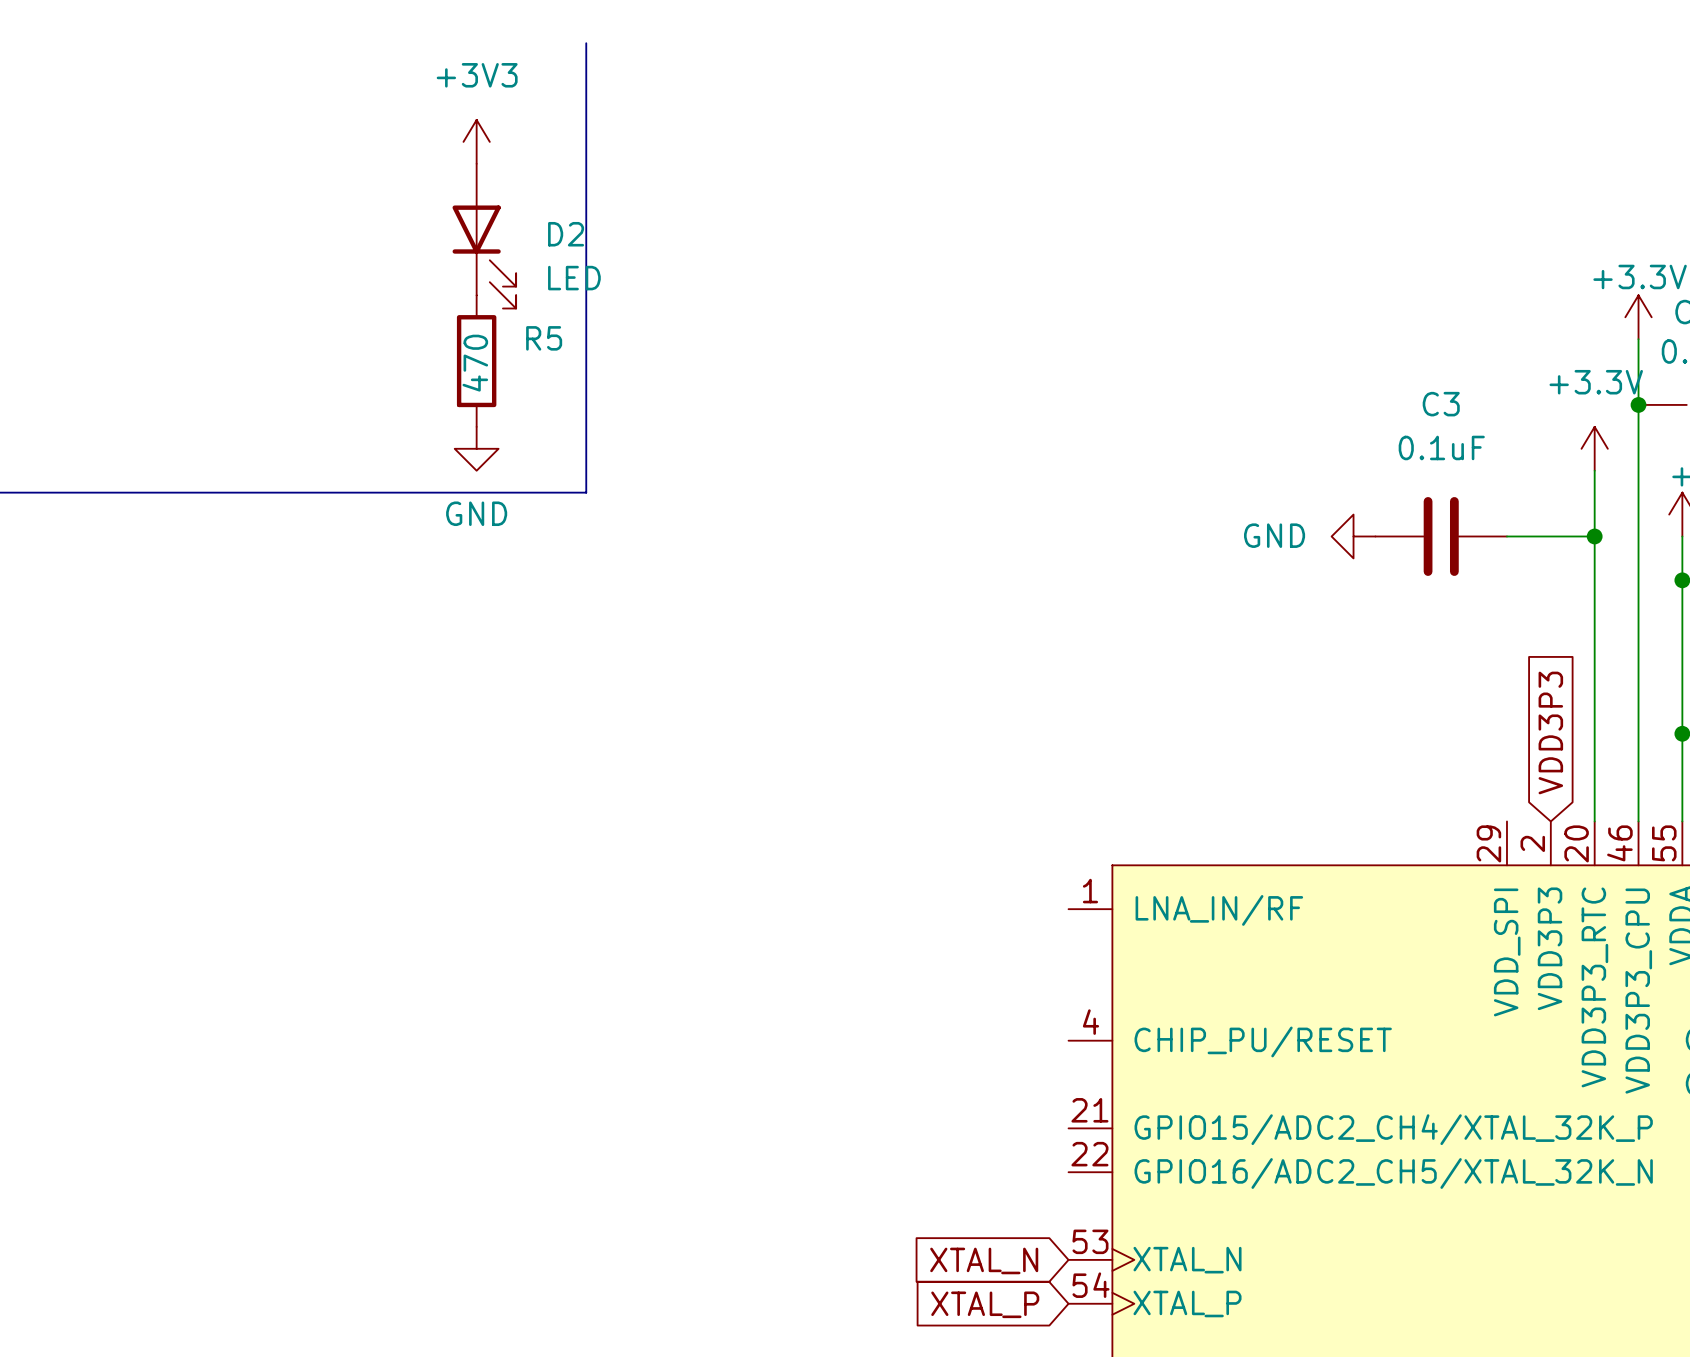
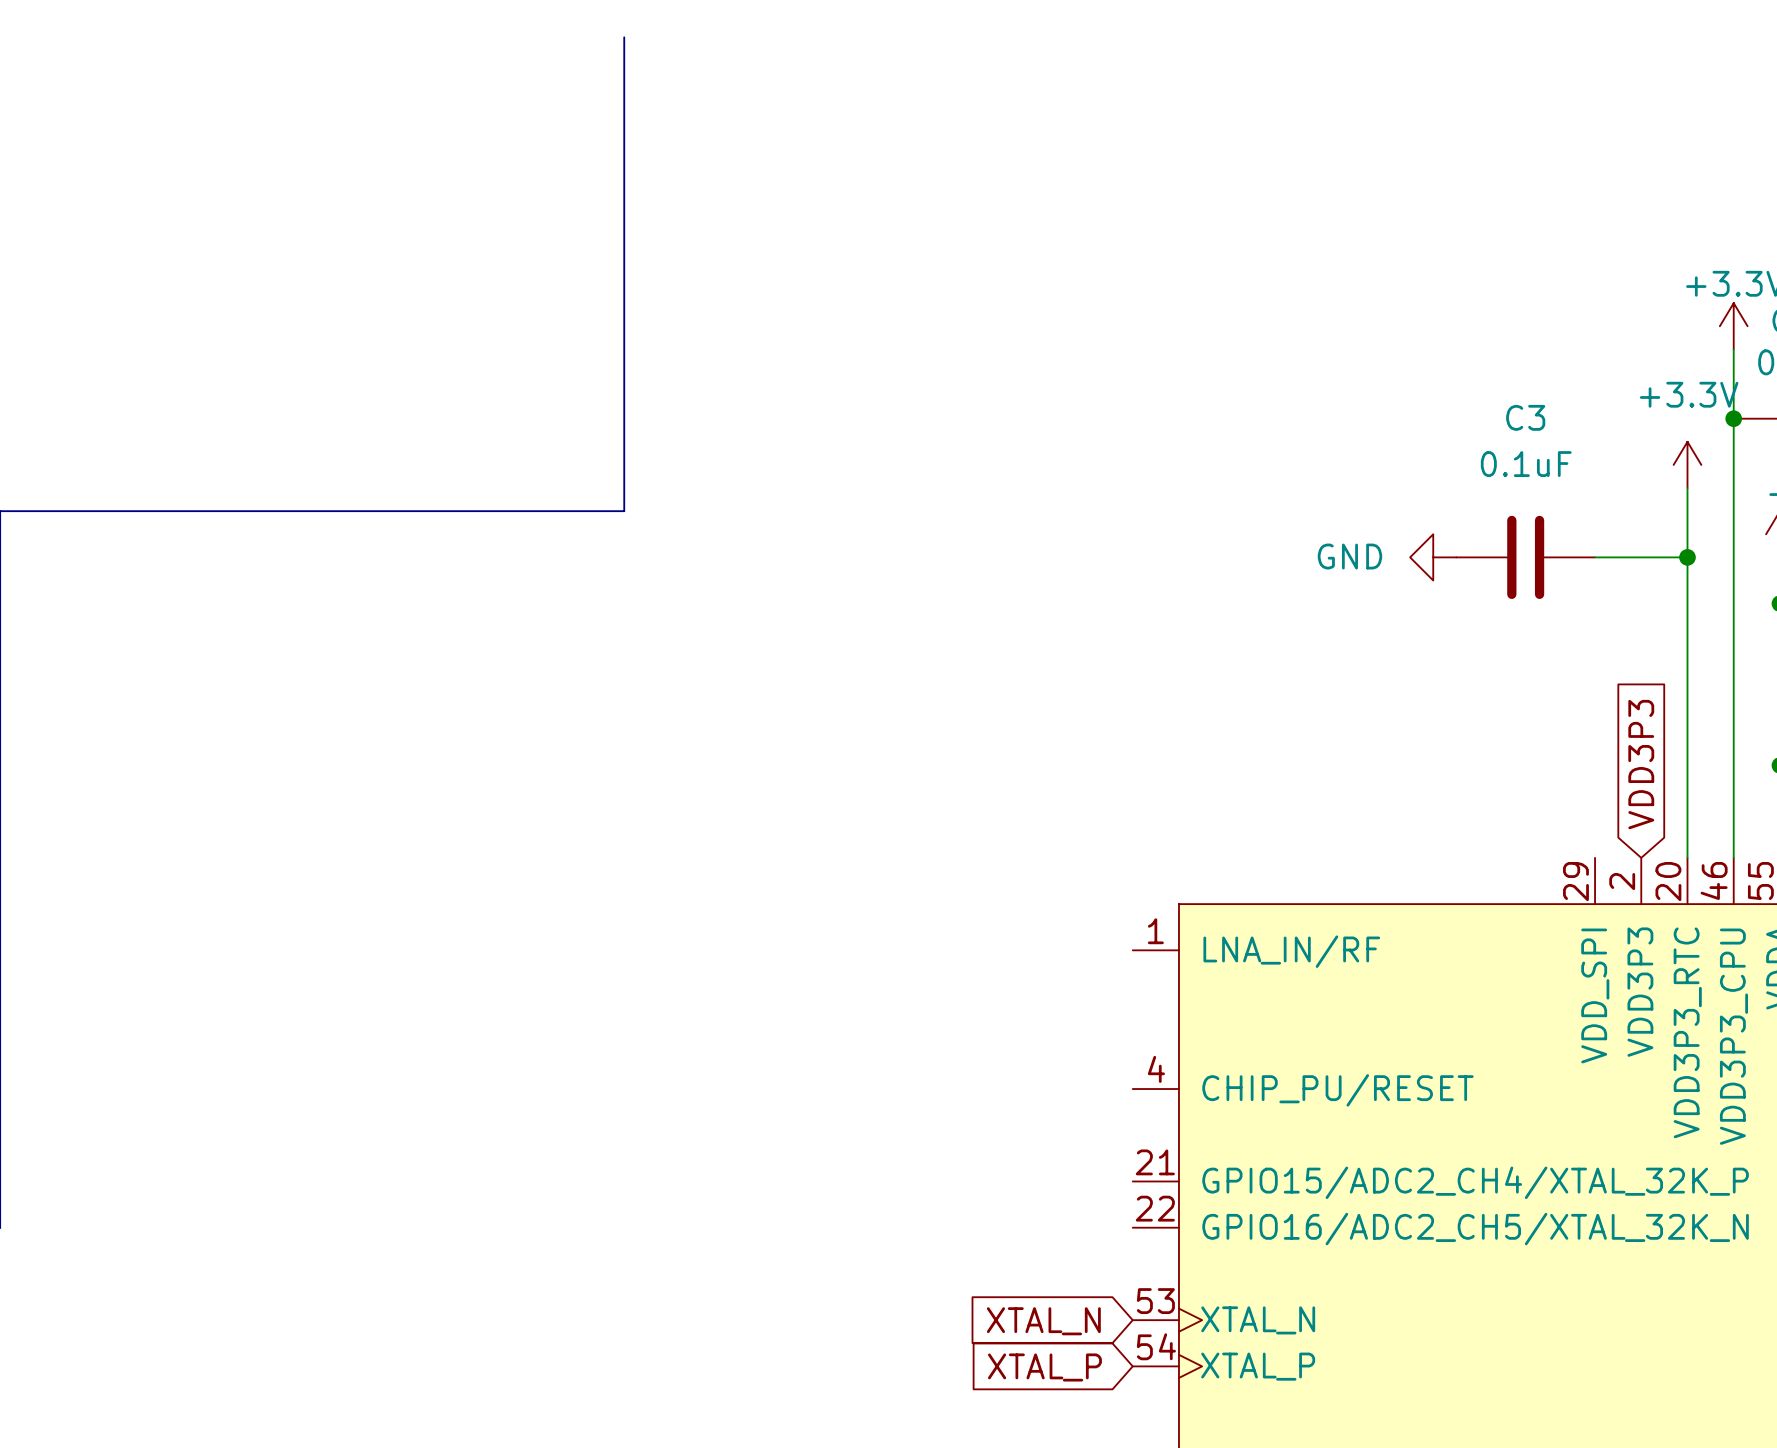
power symbol: +3V3 (476, 141) -> none
D2: LED (484, 236) -> none
R5: 470 (476, 361) -> none
power symbol: GND (476, 448) -> none

